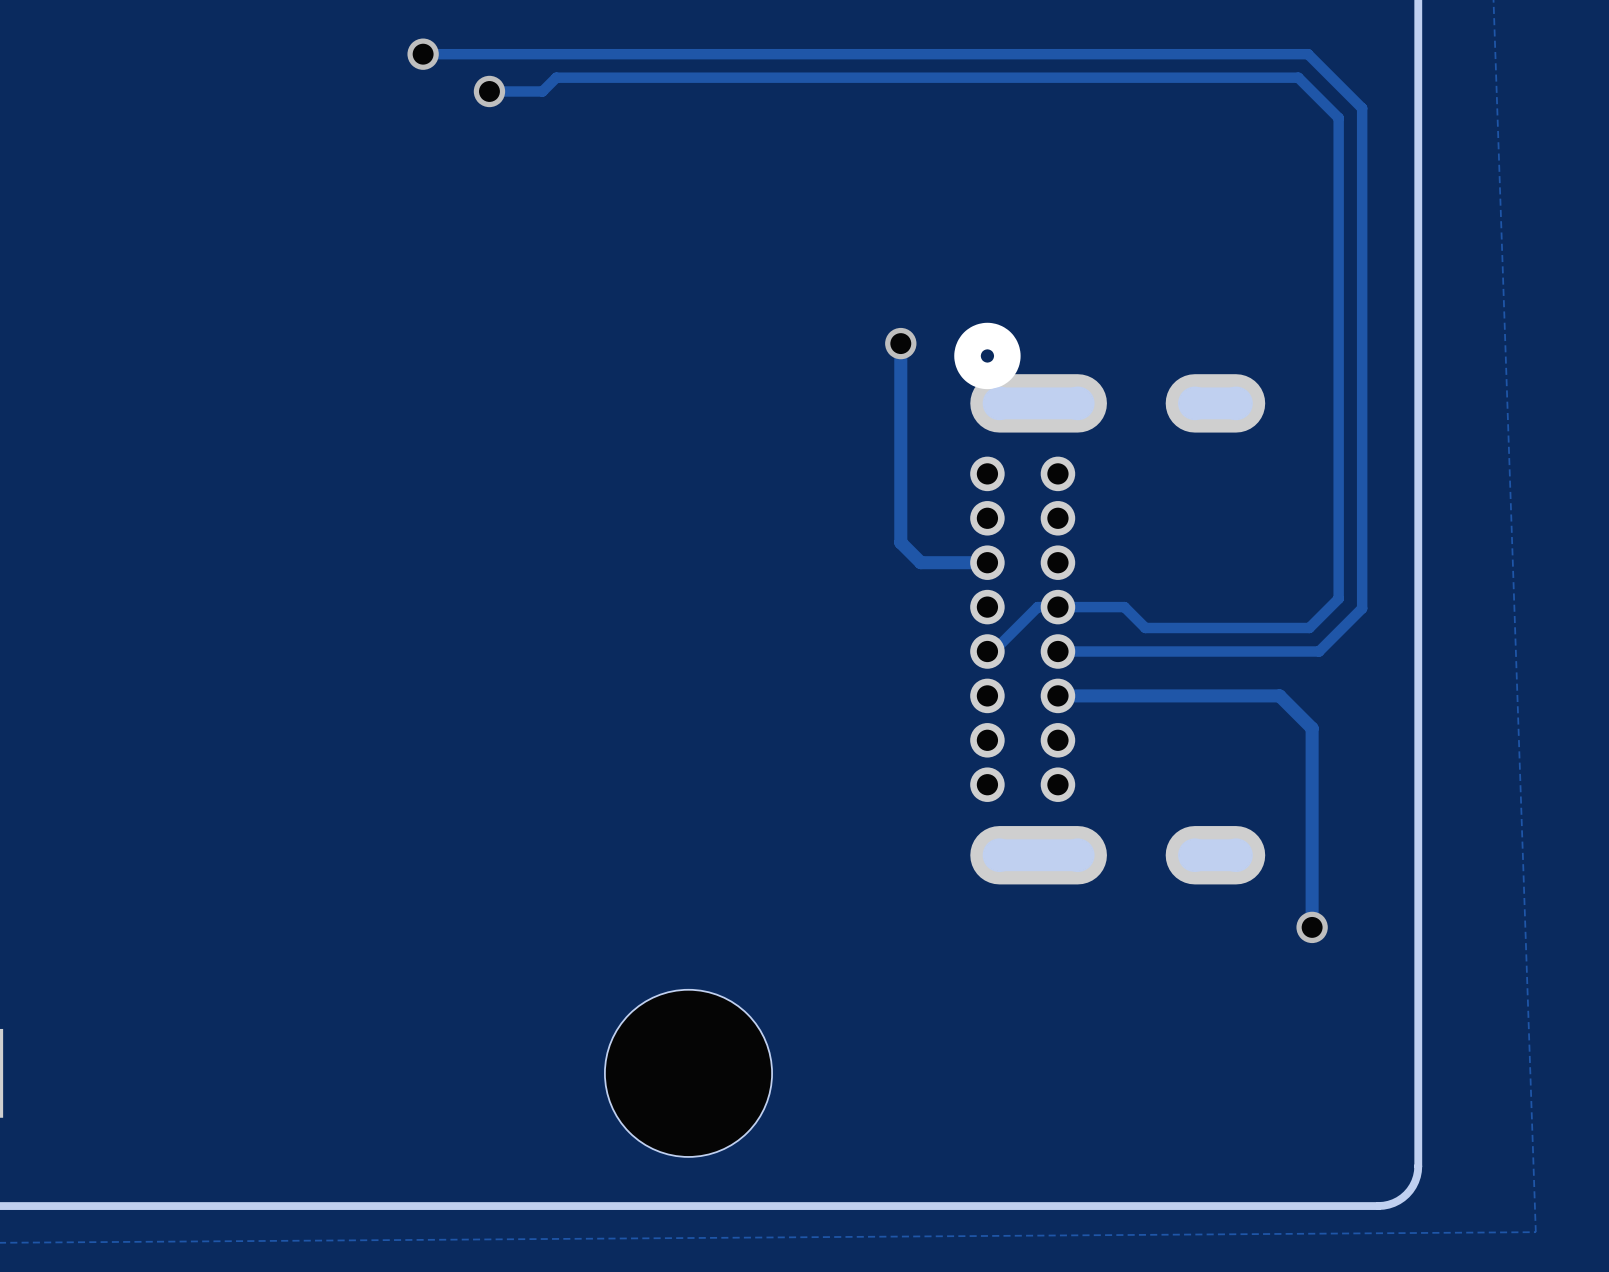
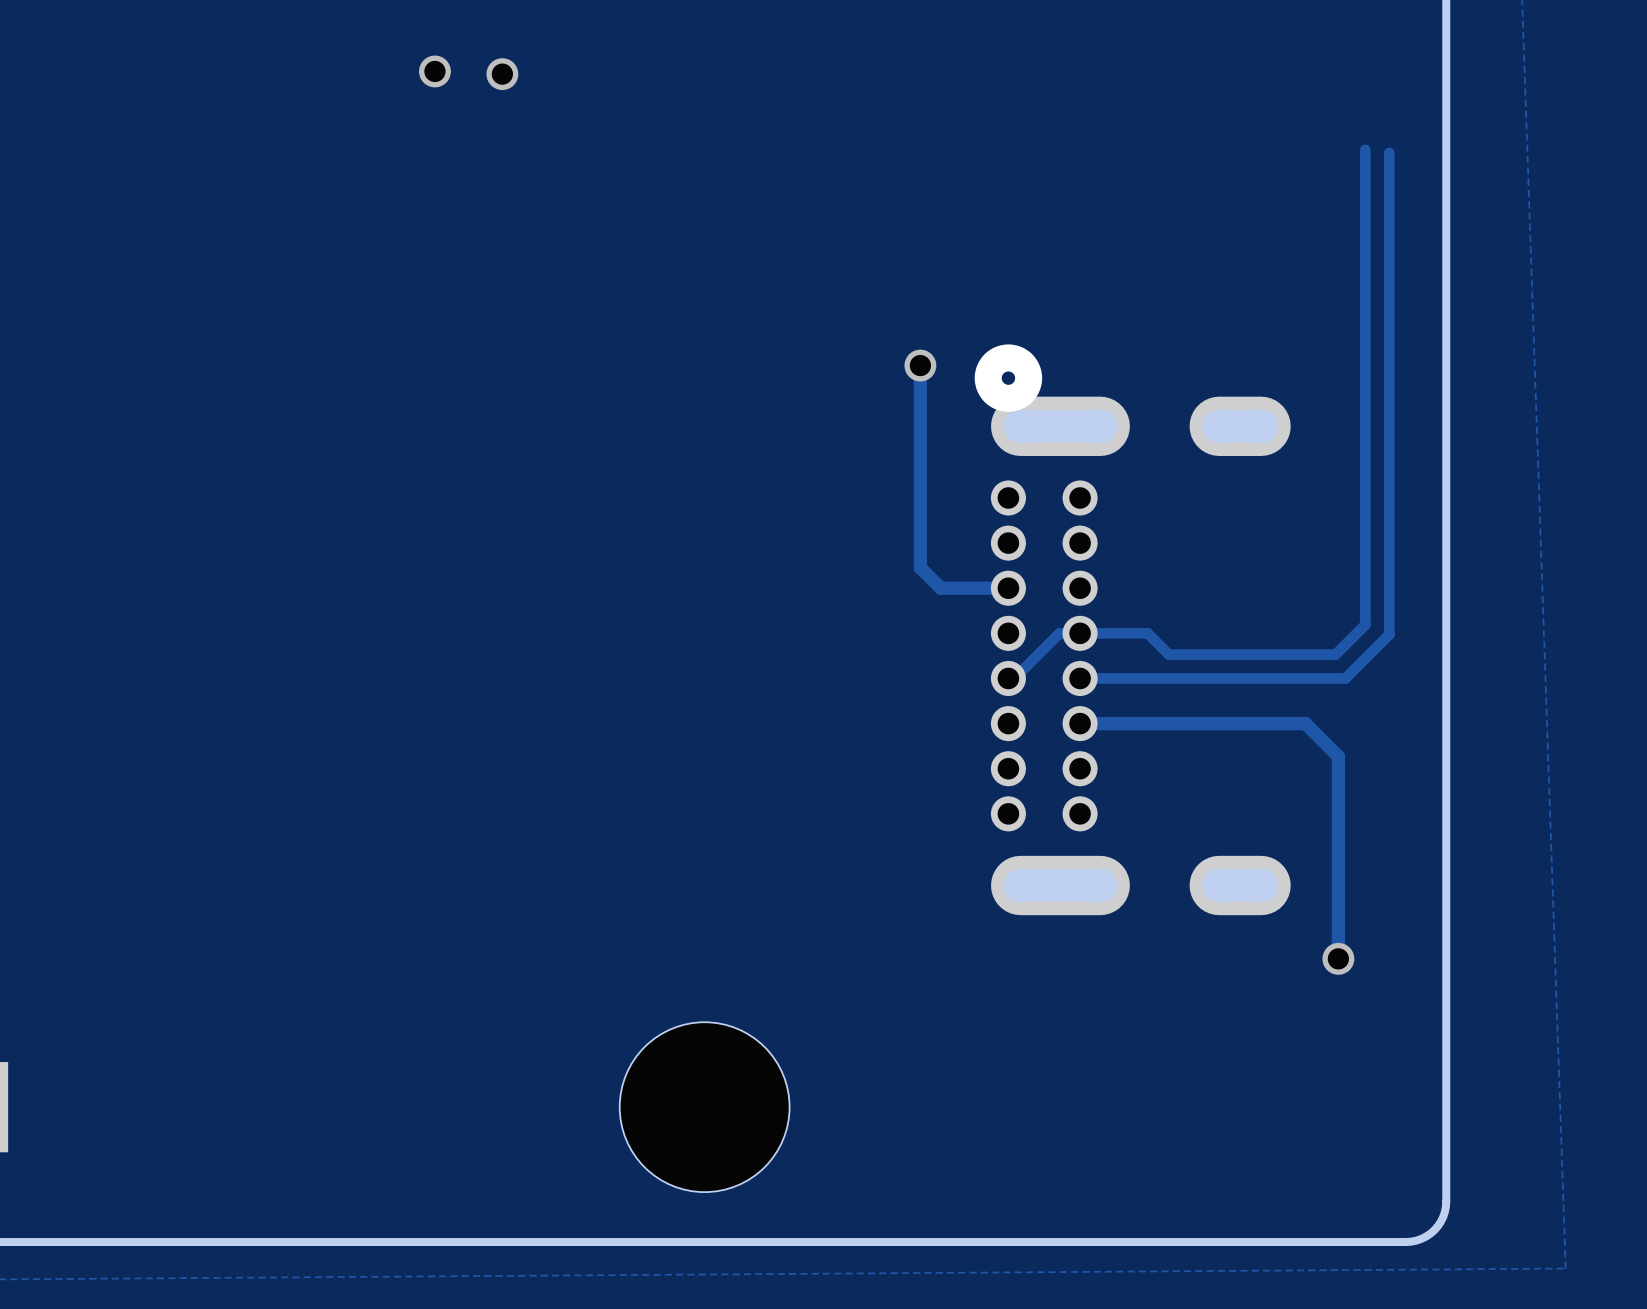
track: (423, 54) (1308, 54) (1362, 108) (1362, 134) -> none
track: (489, 91) (542, 91) (556, 77) (1298, 77) (1338, 118) (1338, 131) -> none
via position: (489, 91) -> (502, 74)

